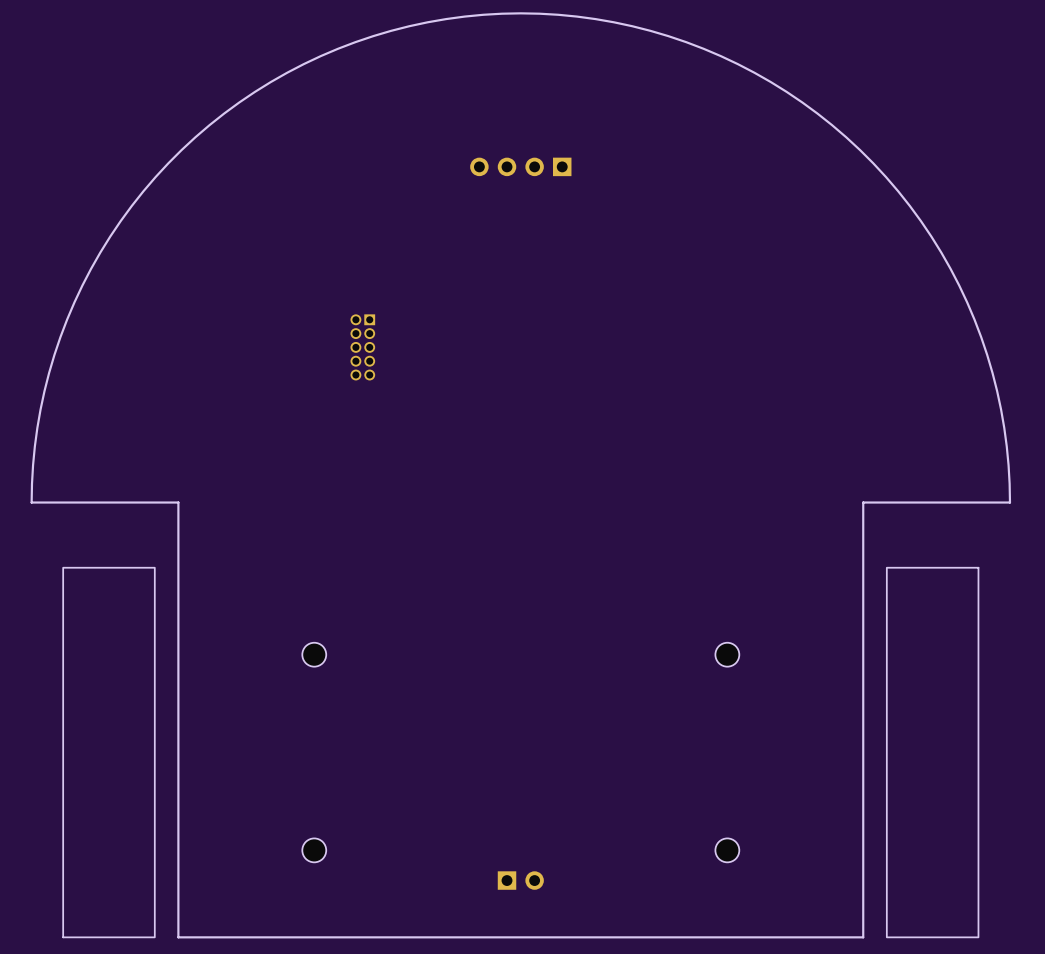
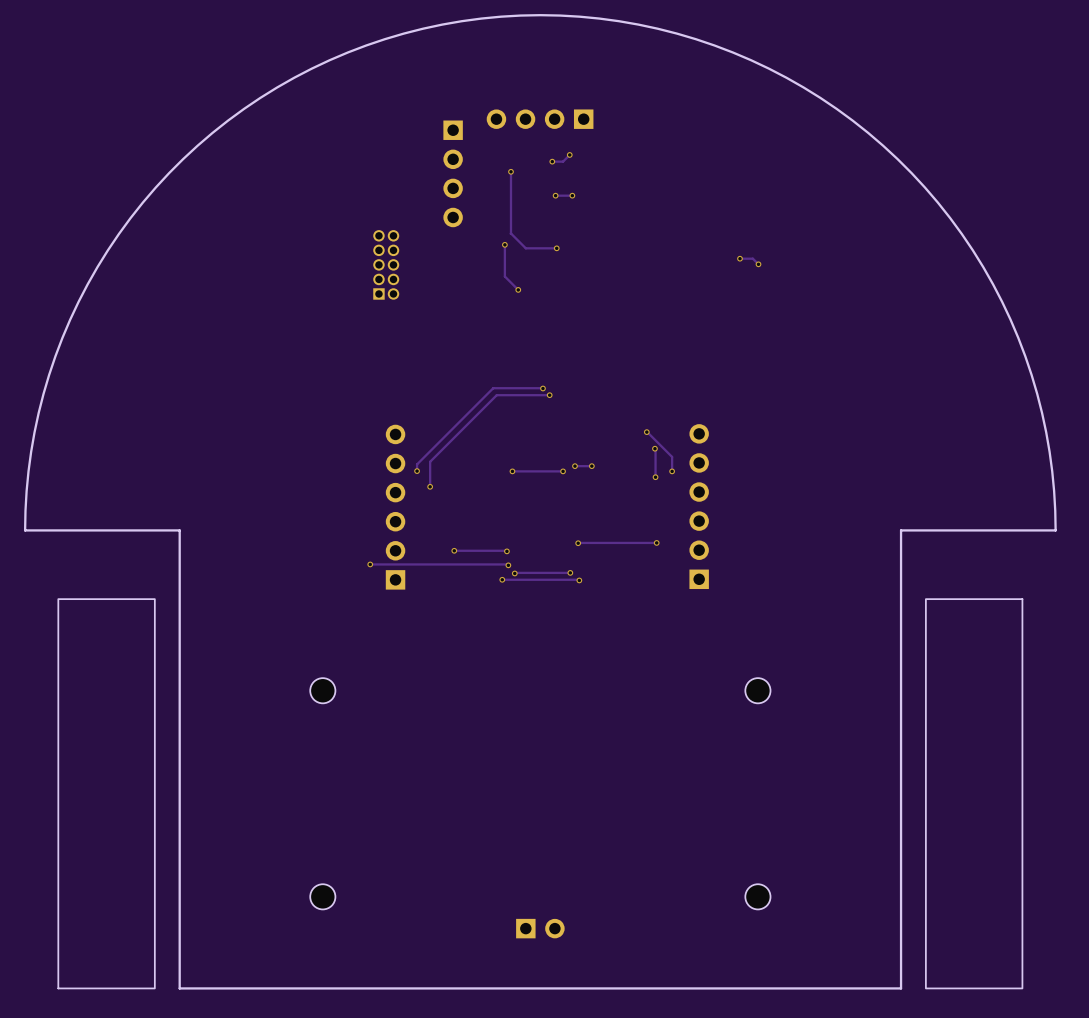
part: none -> (540, 119)
track: none -> (569, 154) (563, 161) (552, 161)
via: none -> (569, 154)
via: none -> (552, 161)
track: none -> (511, 171) (511, 233)
via: none -> (511, 171)
part: none -> (453, 173)
part: (520, 166) -> none
via: none -> (555, 195)
track: none -> (572, 195) (555, 195)
via: none -> (572, 195)
track: none -> (511, 233) (525, 248) (556, 248)
track: none -> (504, 244) (504, 276) (518, 289)
via: none -> (504, 244)
via: none -> (556, 248)
track: none -> (739, 258) (752, 258) (758, 264)
via: none -> (739, 258)
via: none -> (758, 264)
via: none -> (518, 289)
part rotation: 0° (362, 347) -> 180° (386, 264)
part position: (362, 347) -> (386, 264)
track: none -> (542, 388) (493, 388) (417, 464) (417, 471)
via: none -> (542, 388)
track: none -> (549, 395) (496, 395) (430, 461) (430, 486)
via: none -> (549, 395)
track: none -> (646, 432) (672, 456) (672, 471)
via: none -> (646, 432)
track: none -> (654, 448) (655, 477)
via: none -> (654, 448)
via: none -> (574, 466)
track: none -> (591, 466) (574, 466)
via: none -> (591, 466)
via: none -> (417, 471)
via: none -> (512, 471)
track: none -> (563, 471) (512, 471)
via: none -> (563, 471)
via: none -> (672, 471)
via: none -> (655, 477)
via: none -> (430, 486)
part: none -> (699, 506)
part: none -> (395, 507)
via: none -> (578, 543)
track: none -> (656, 542) (578, 543)
via: none -> (656, 542)
track: none -> (454, 550) (506, 551)
via: none -> (454, 550)
via: none -> (506, 551)
track: none -> (370, 564) (508, 565)
via: none -> (370, 564)
via: none -> (508, 565)
track: none -> (570, 572) (514, 573)
via: none -> (570, 572)
via: none -> (514, 573)
track: none -> (502, 579) (579, 580)
via: none -> (502, 579)
via: none -> (579, 580)

